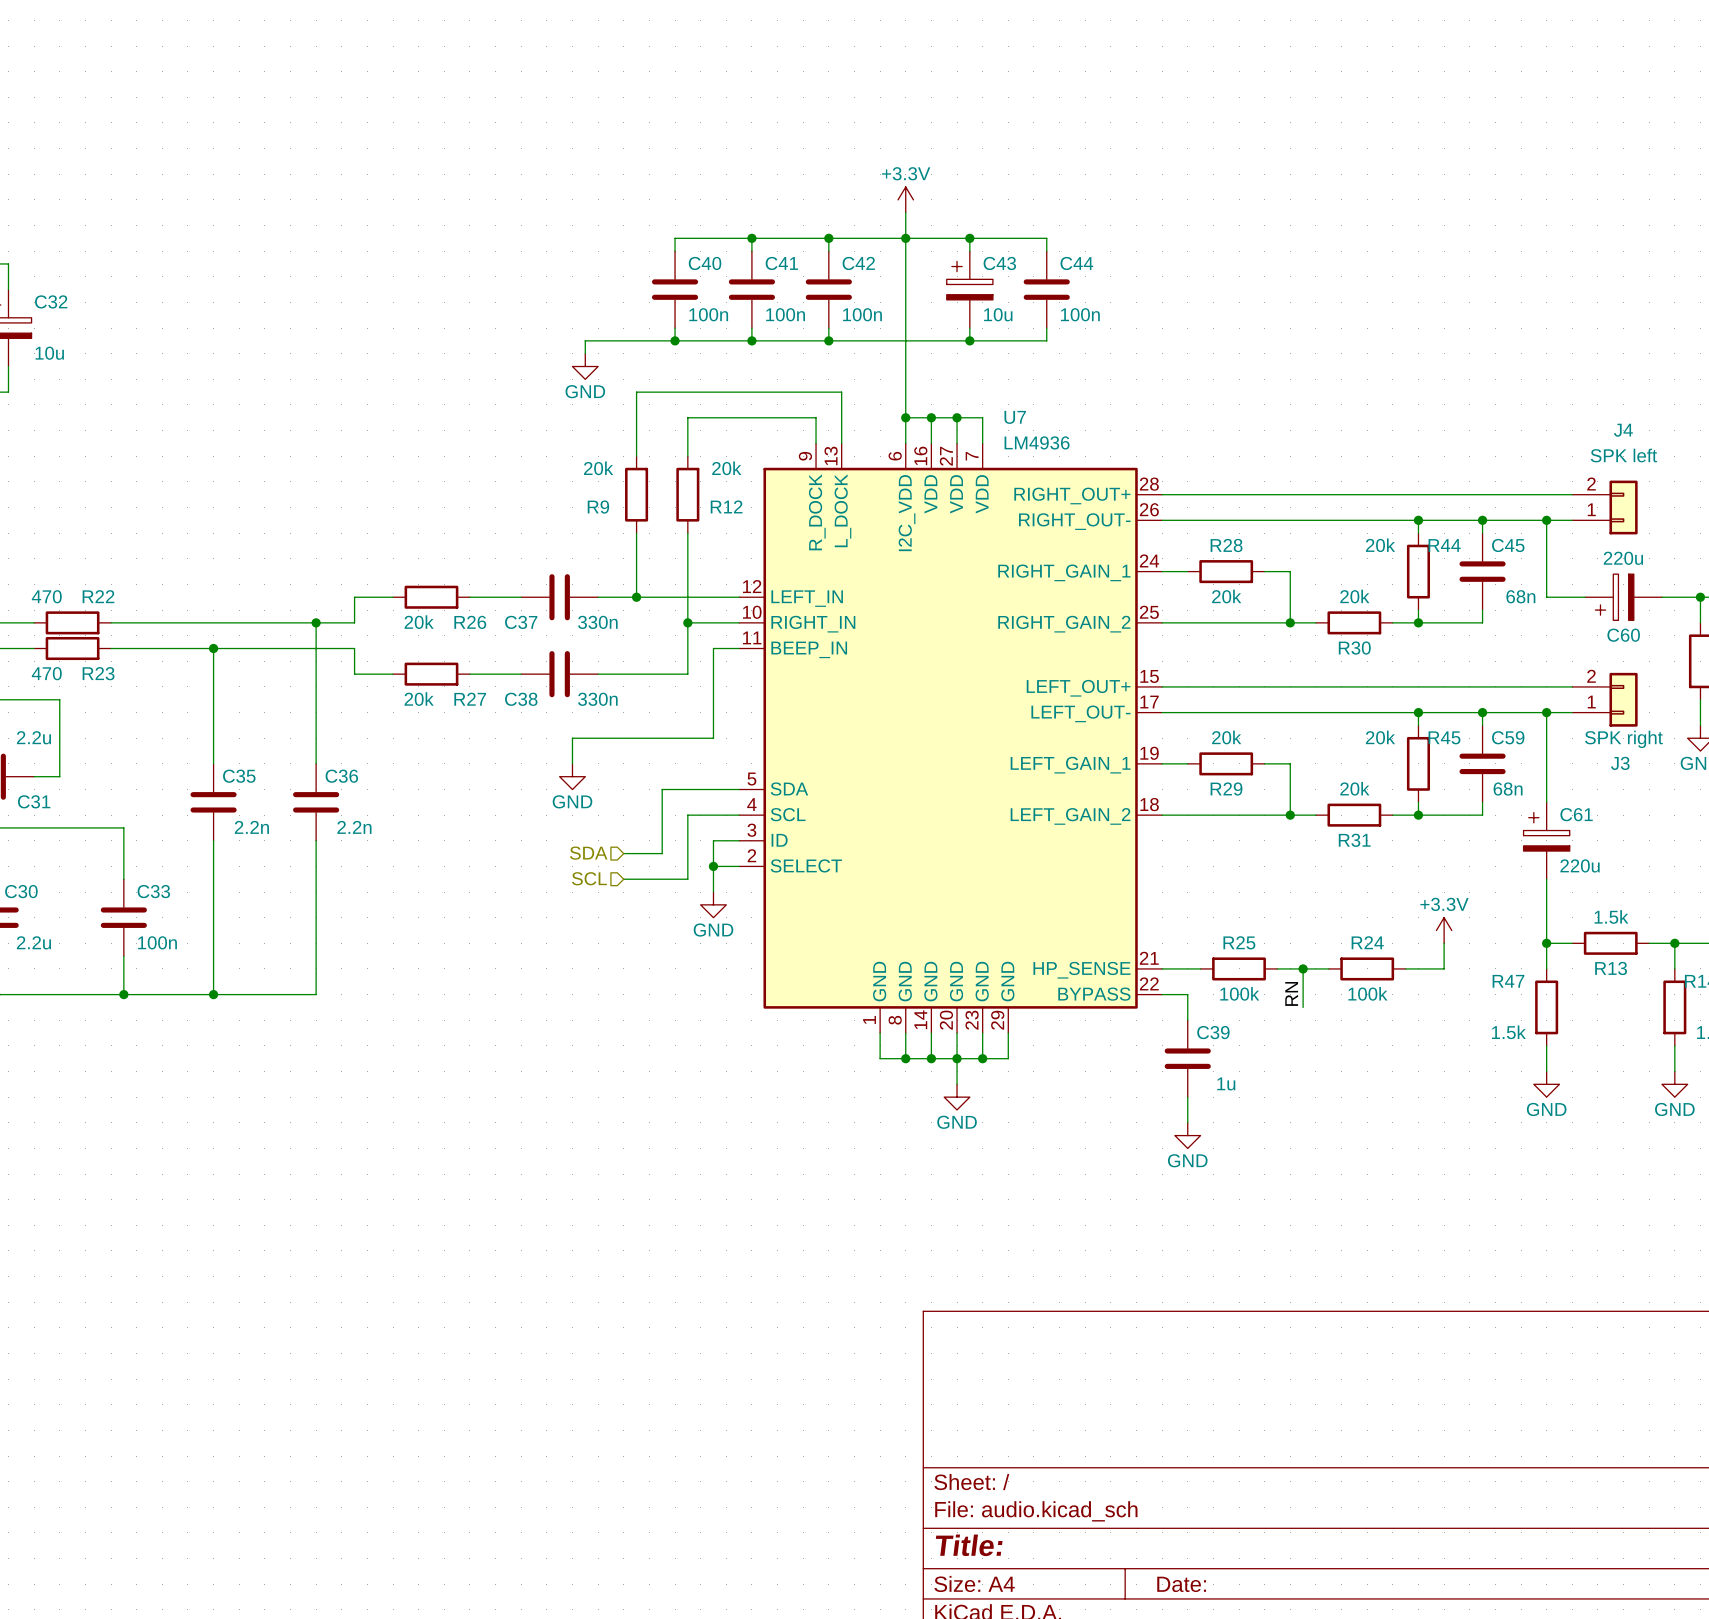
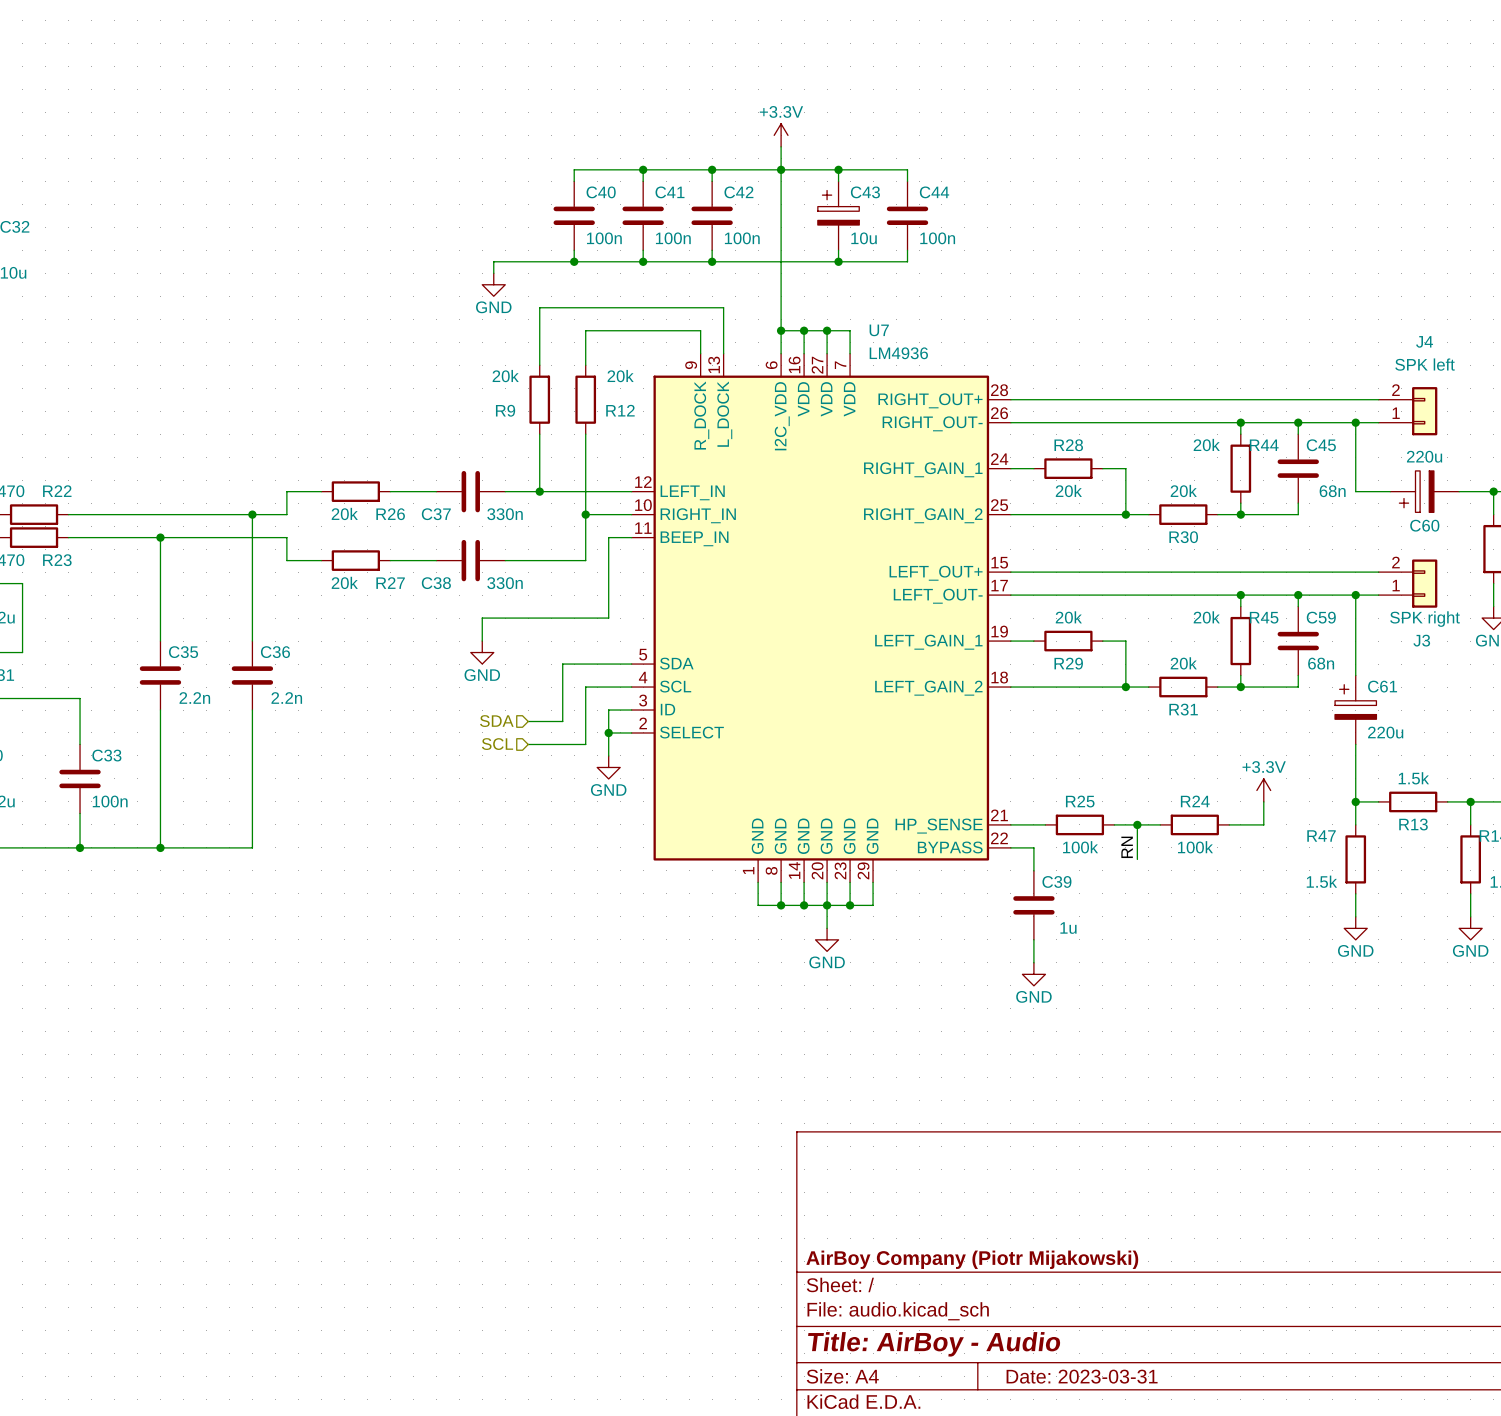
title block: none -> AirBoy Company (Piotr Mijakowski) (972, 1259)
title block: Title: (969, 1545) -> Title: AirBoy - Audio (934, 1344)
title block: Date: (1181, 1584) -> Date: 2023-03-31 (1082, 1376)

